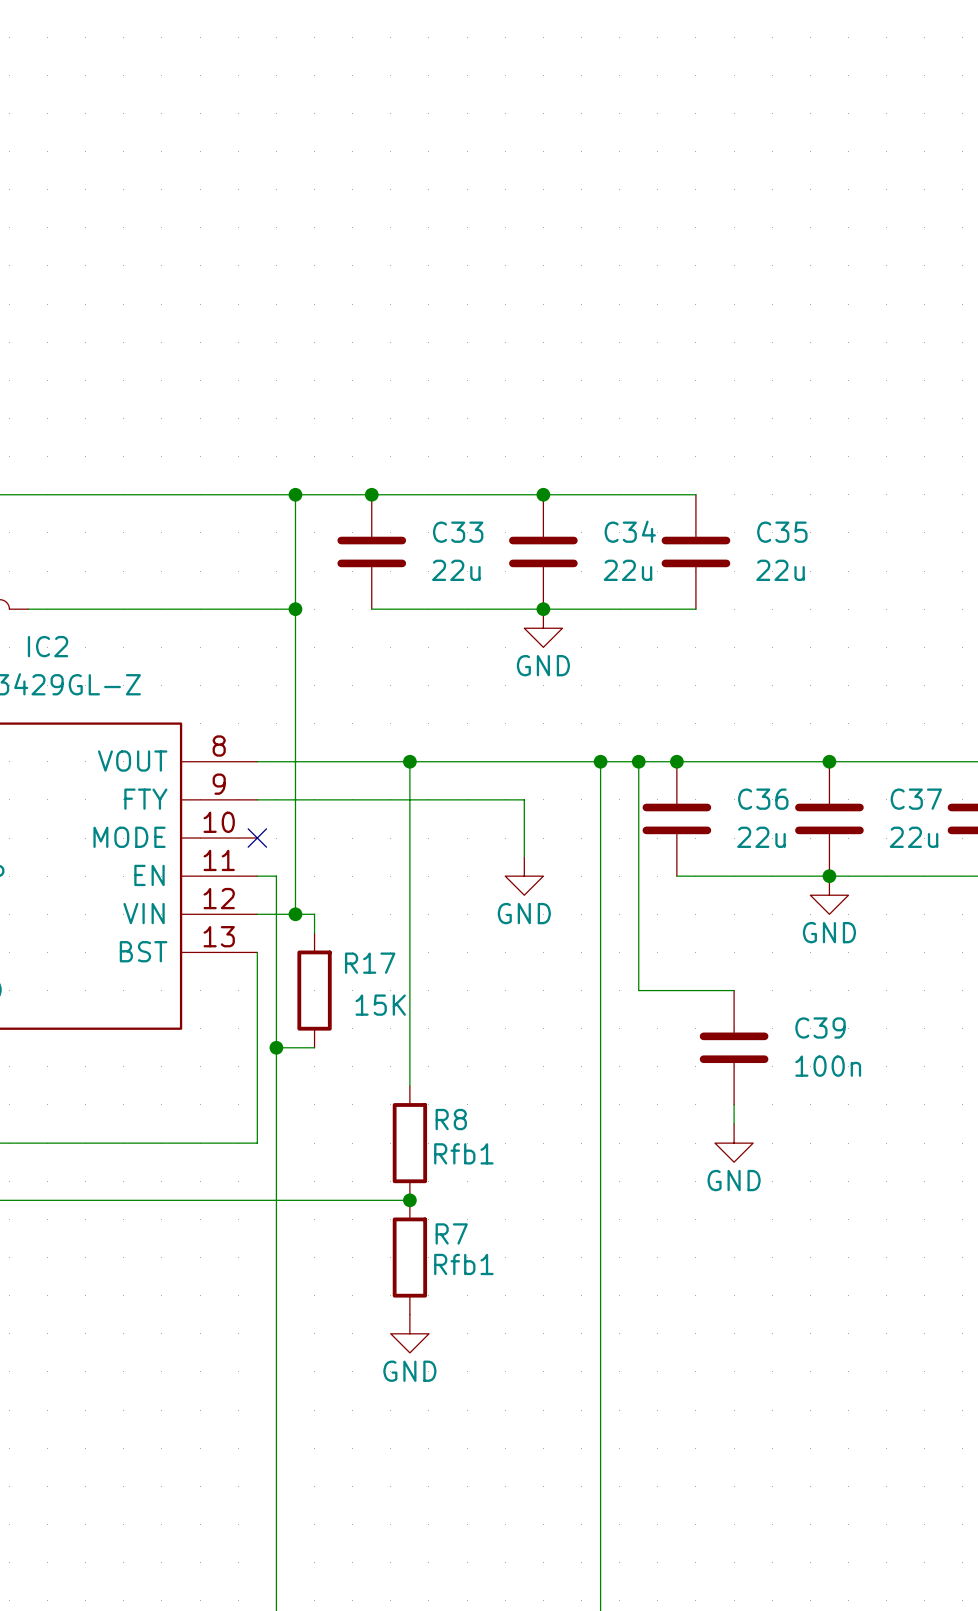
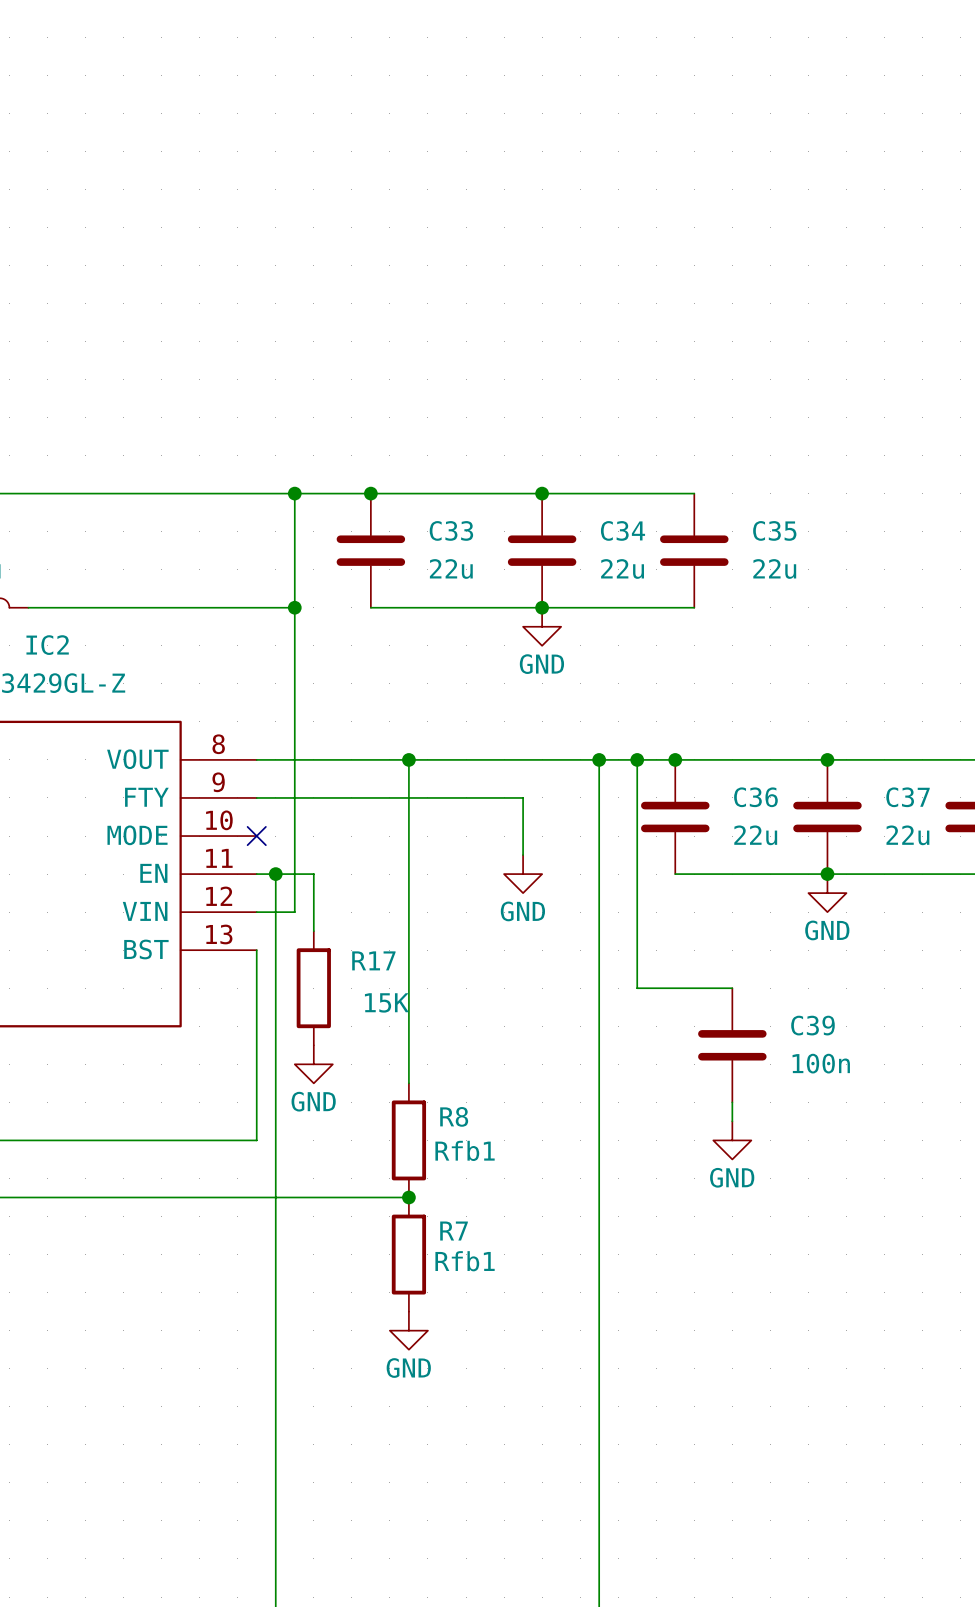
wire: (295, 914) (314, 914) -> (275, 874) (313, 874) (313, 912)
junction position: (295, 914) -> (275, 874)
wire: (276, 1047) (314, 1047) -> none
junction: (276, 1047) -> none
power symbol: none -> GND (313, 1064)

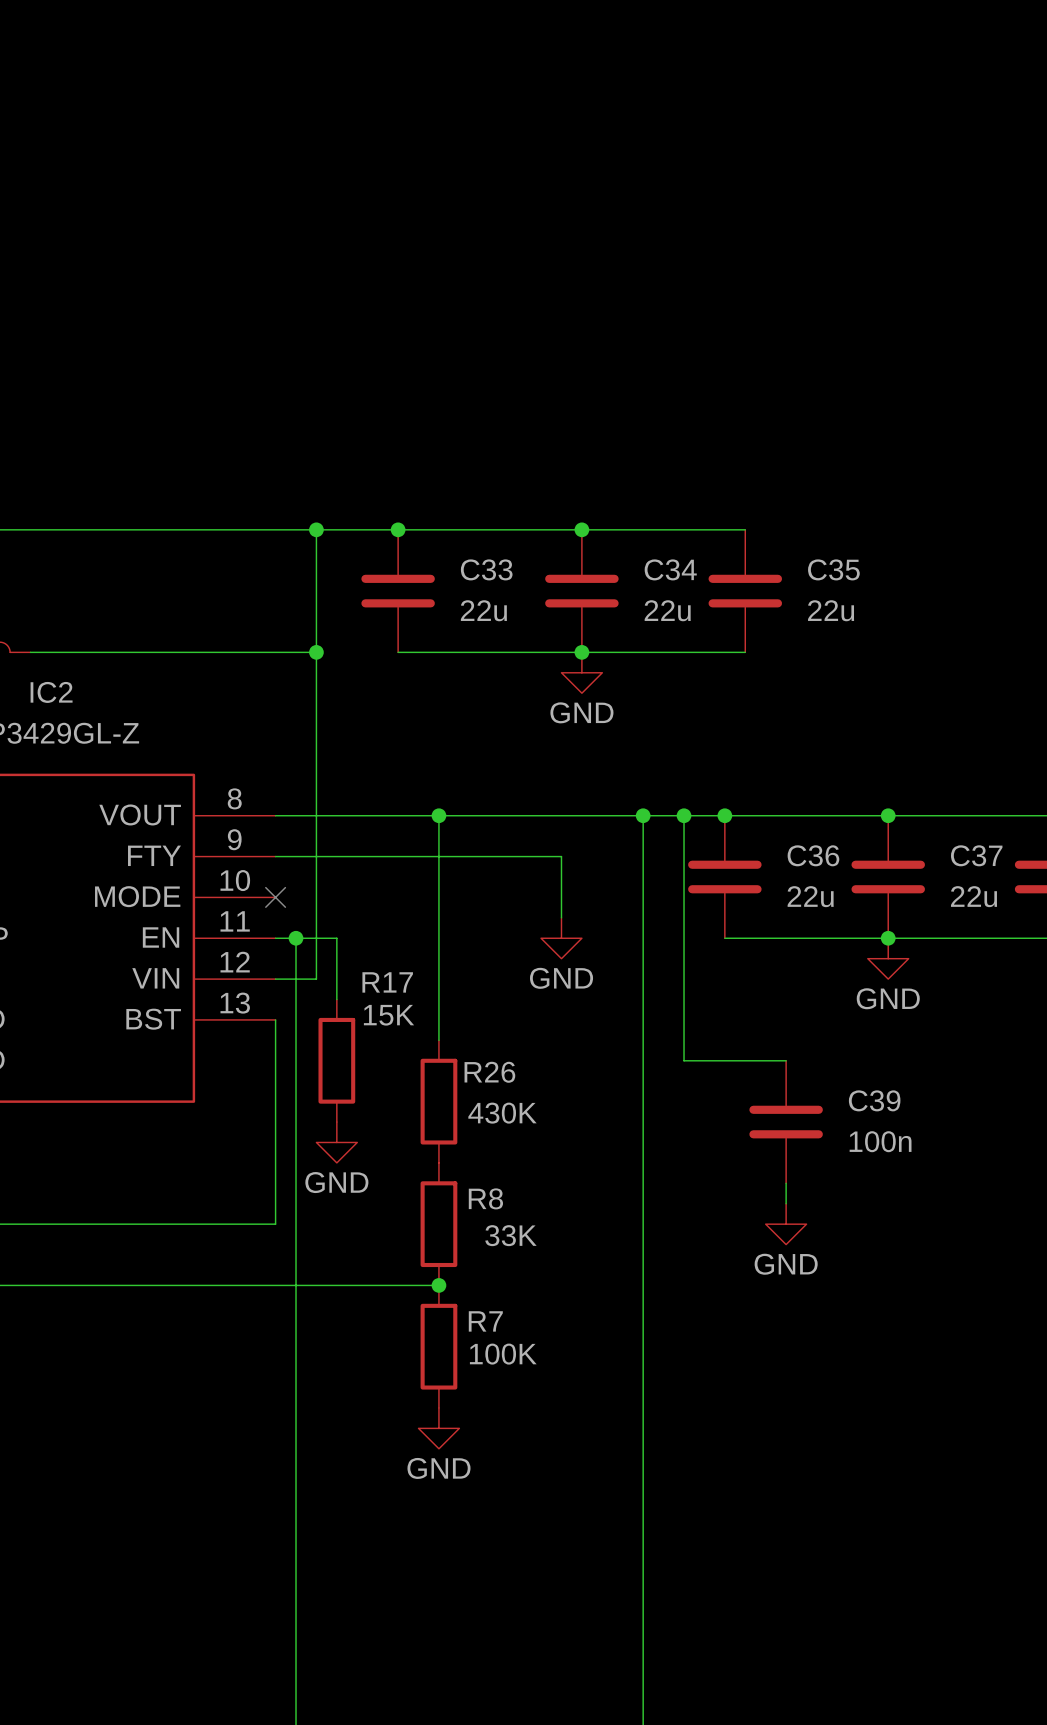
R17 name position: R17 (373, 960) -> R17 (387, 982)
wire: (408, 969) (408, 1083) -> none
R17 value position: 15K (386, 1002) -> 15K (389, 1015)
R26: none -> 430K (438, 1101)
R8 value: Rfb1 (465, 1150) -> 33K (510, 1235)
R7 value: Rfb1 (465, 1261) -> 100K (503, 1354)

